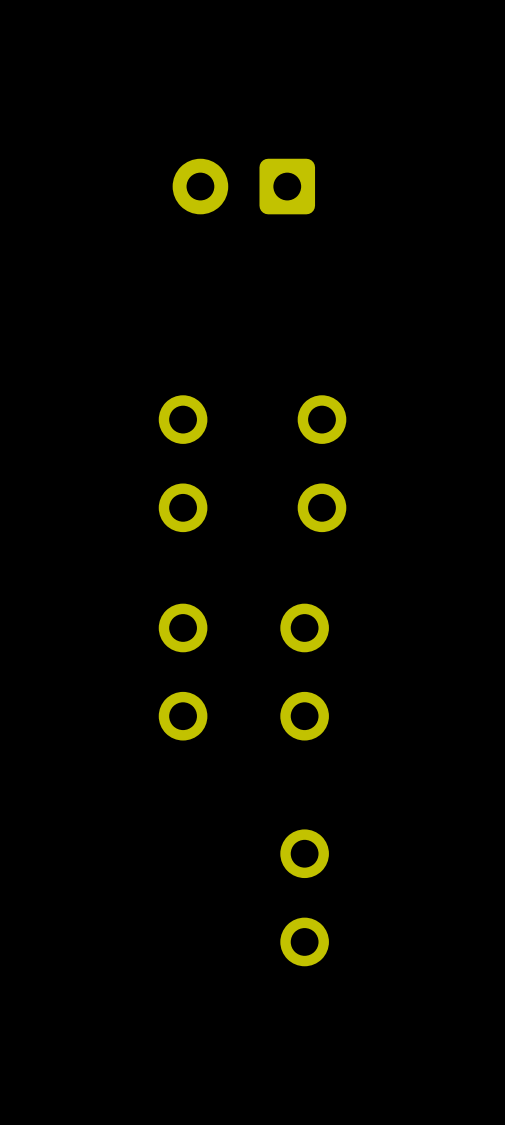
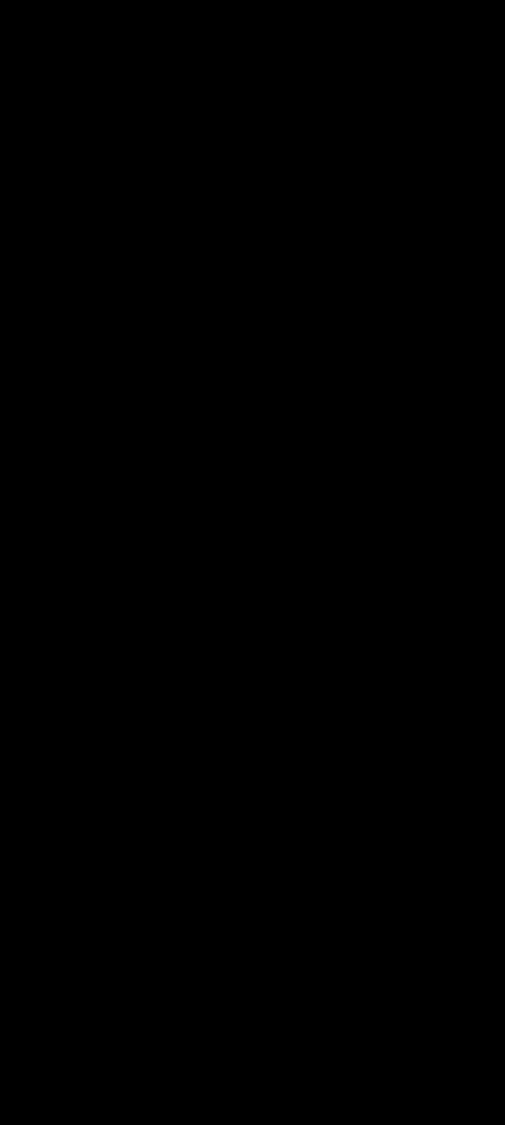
part: (243, 186) -> none
part: (183, 463) -> none
part: (321, 463) -> none
part: (183, 672) -> none
part: (304, 672) -> none
part: (304, 897) -> none

